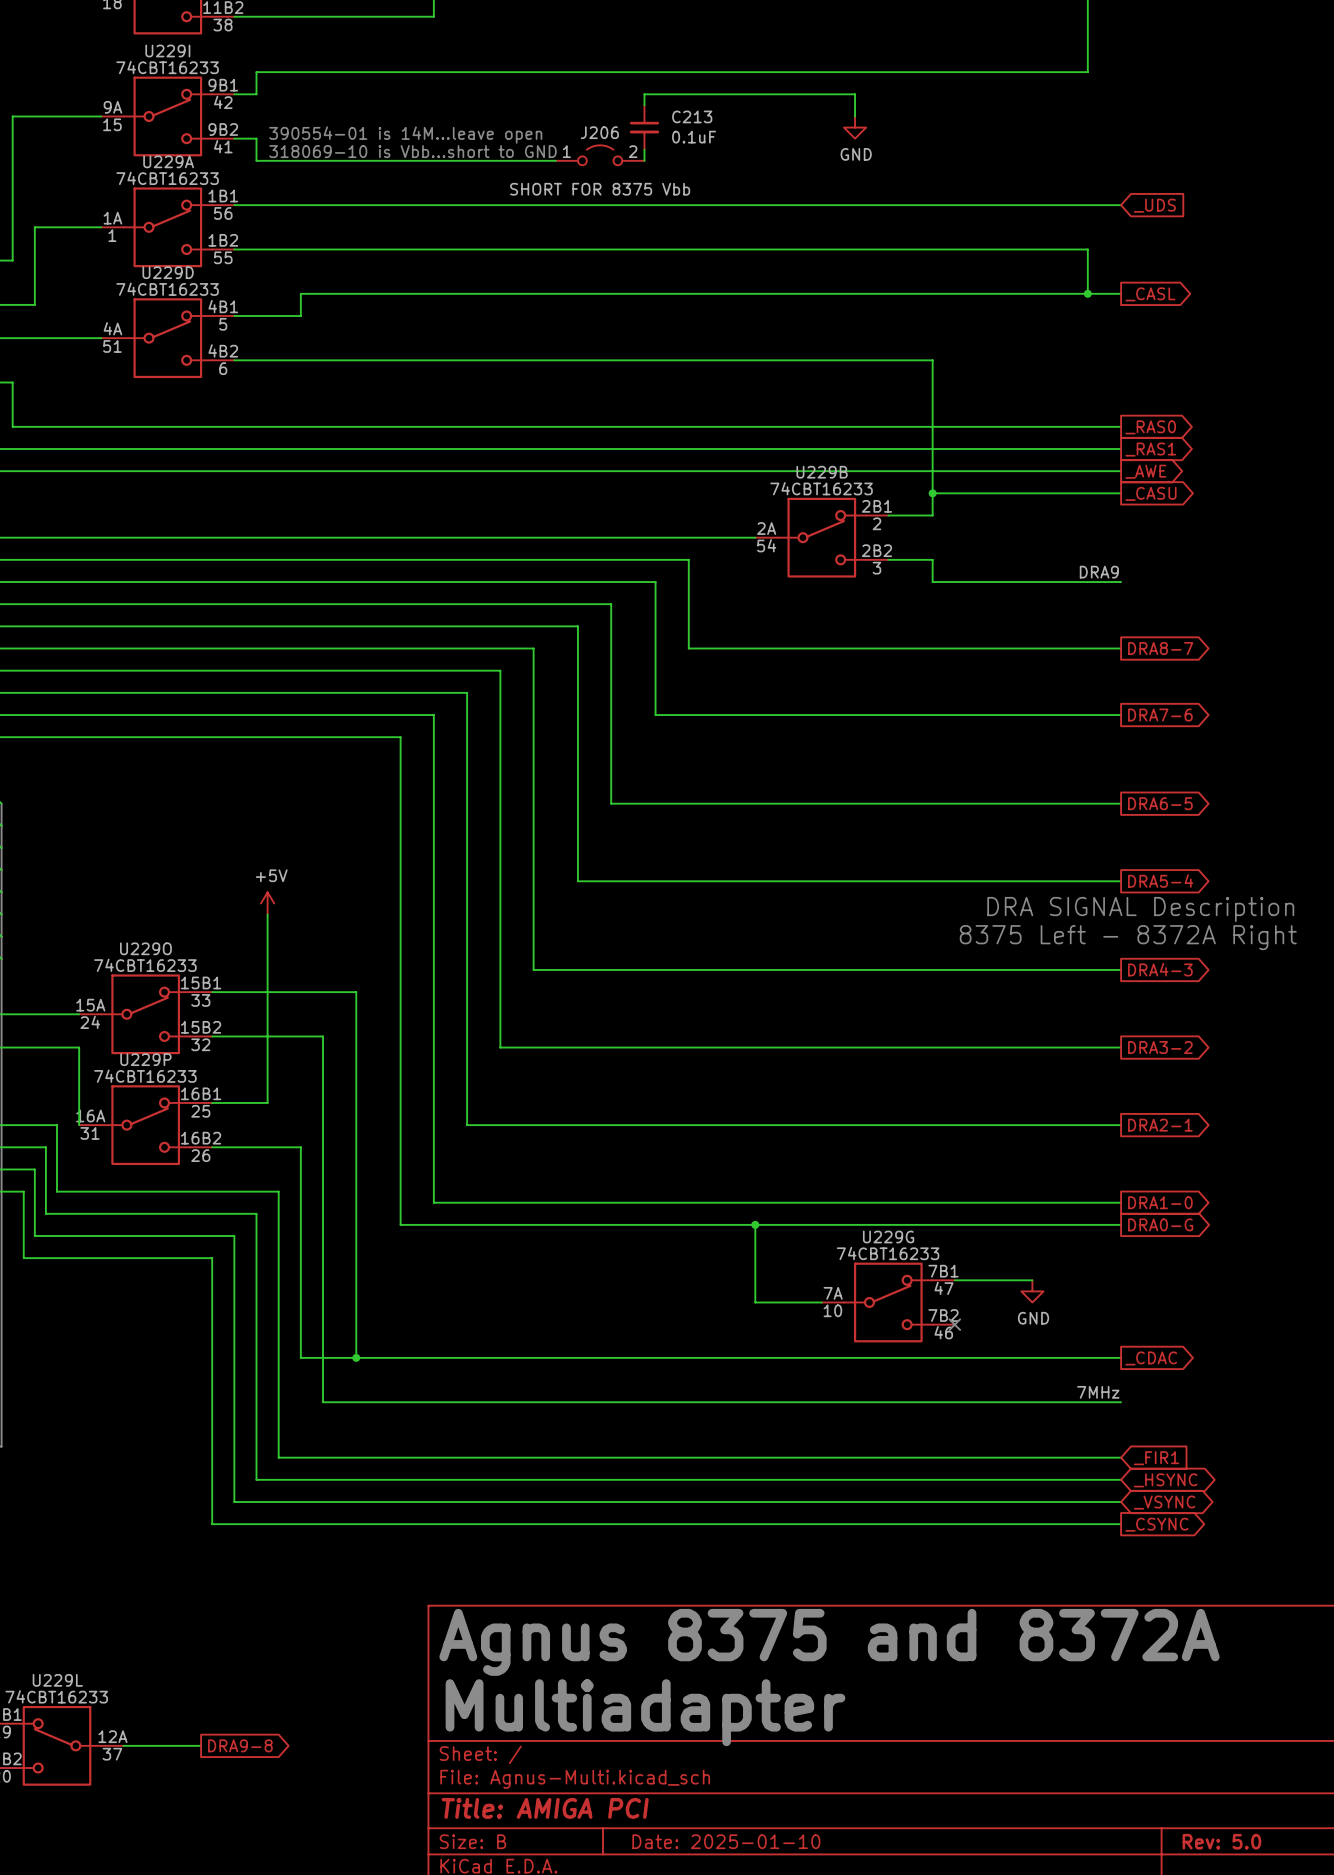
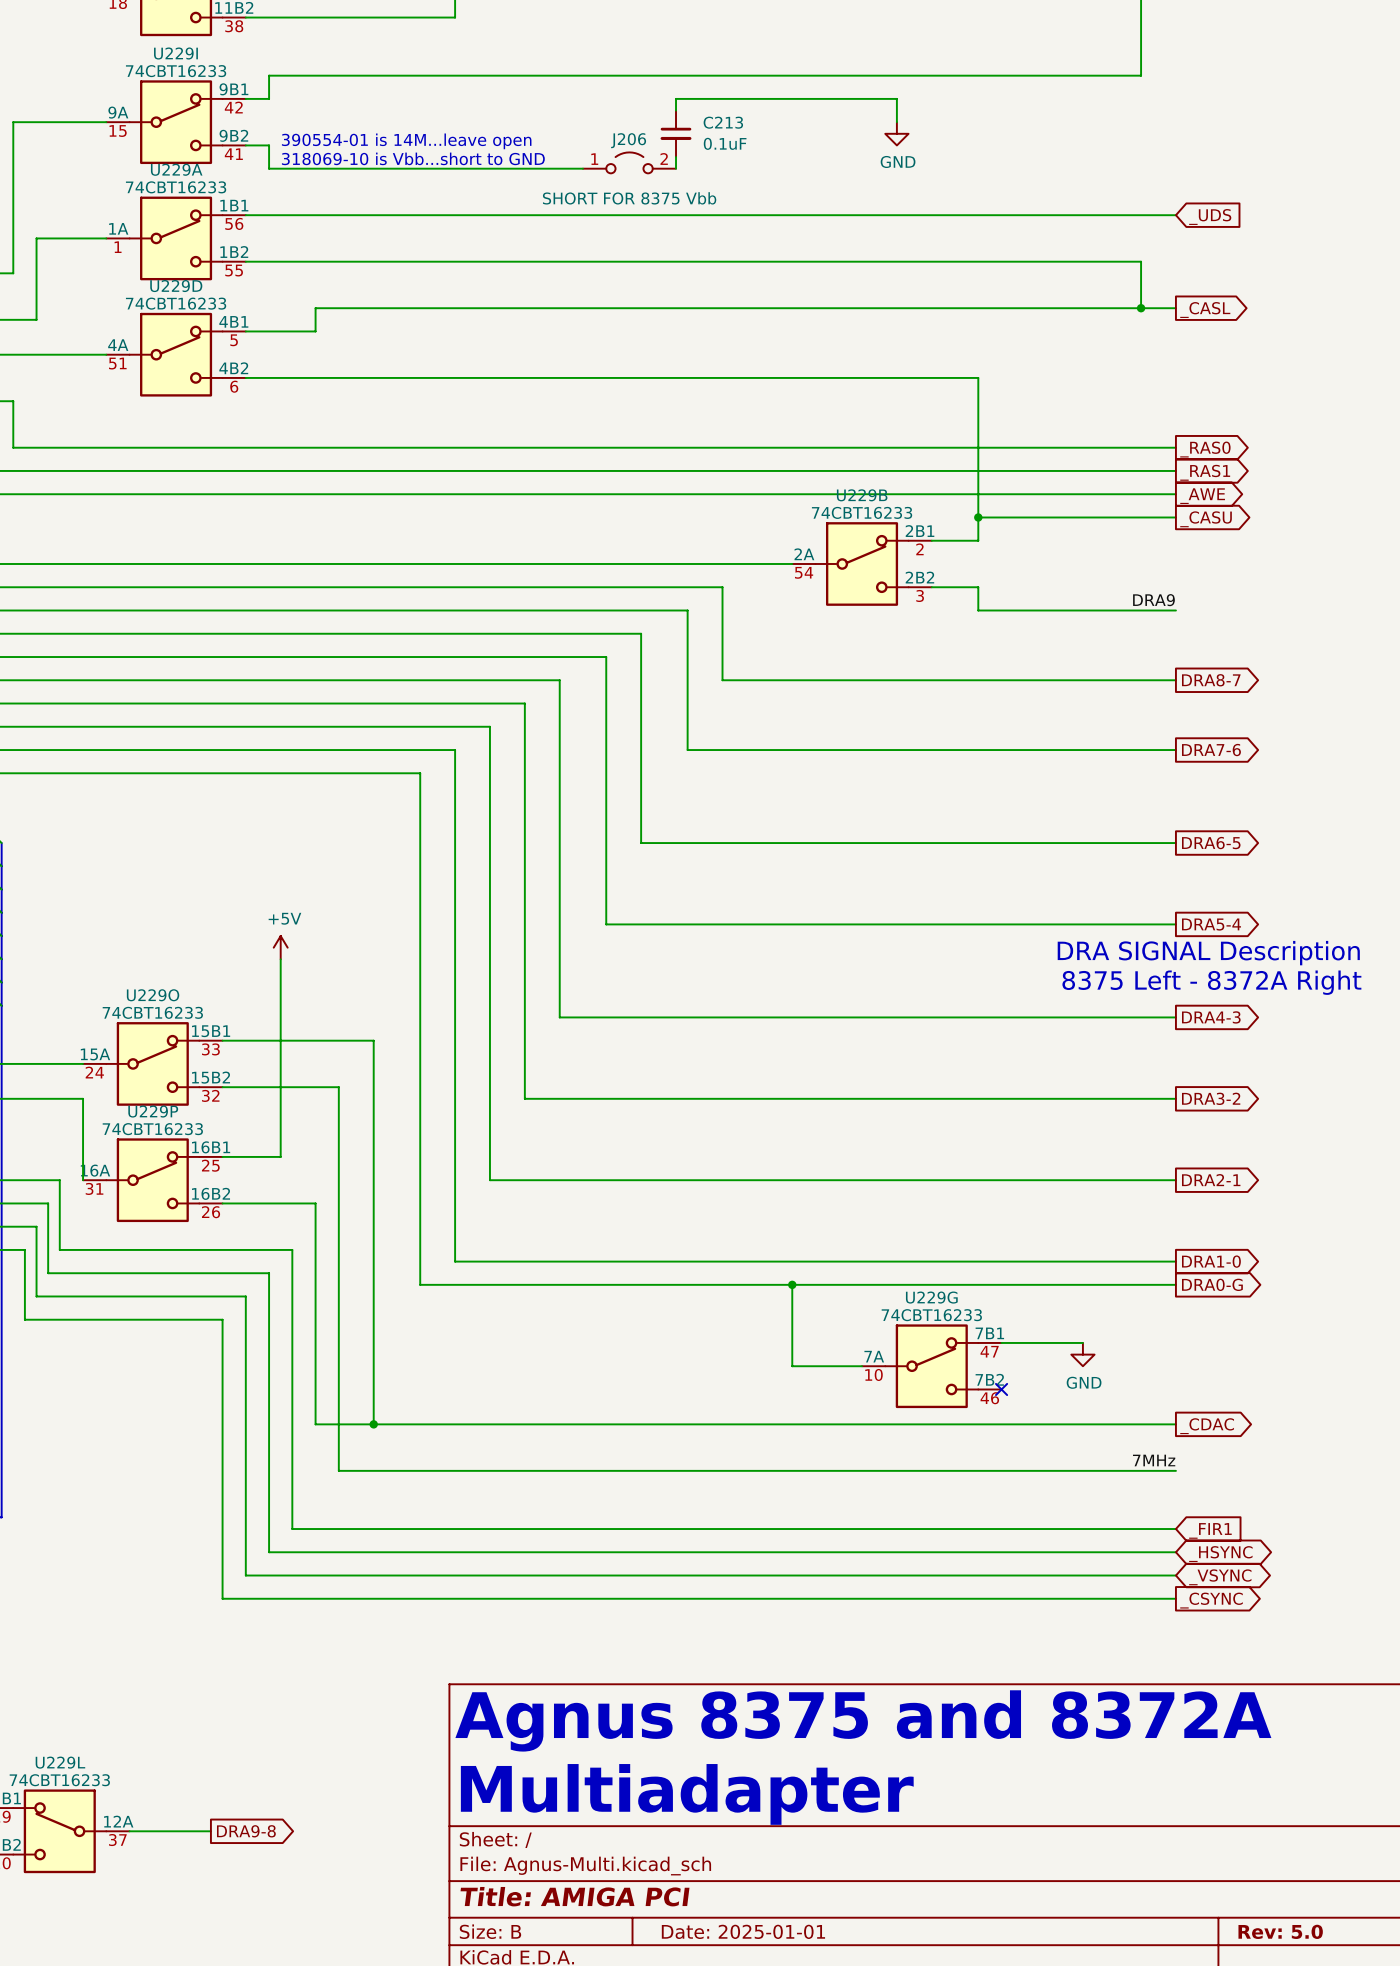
title block: Date: 2025-01-10 (726, 1841) -> Date: 2025-01-01 (743, 1931)

